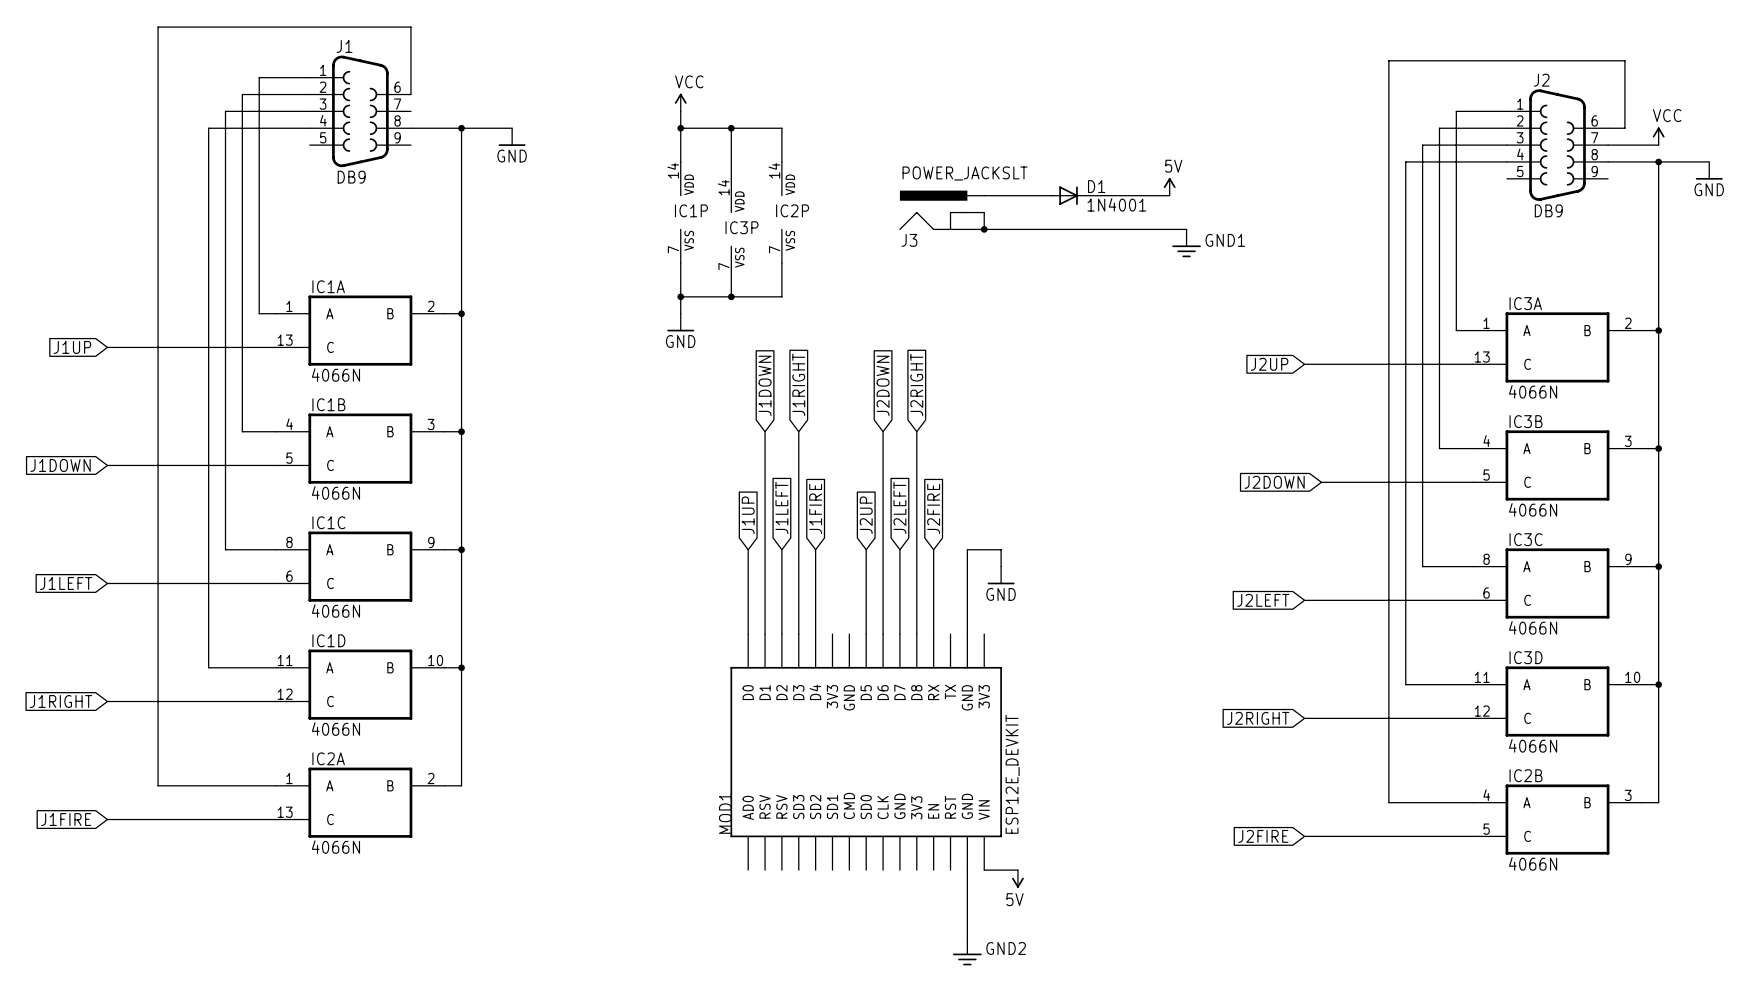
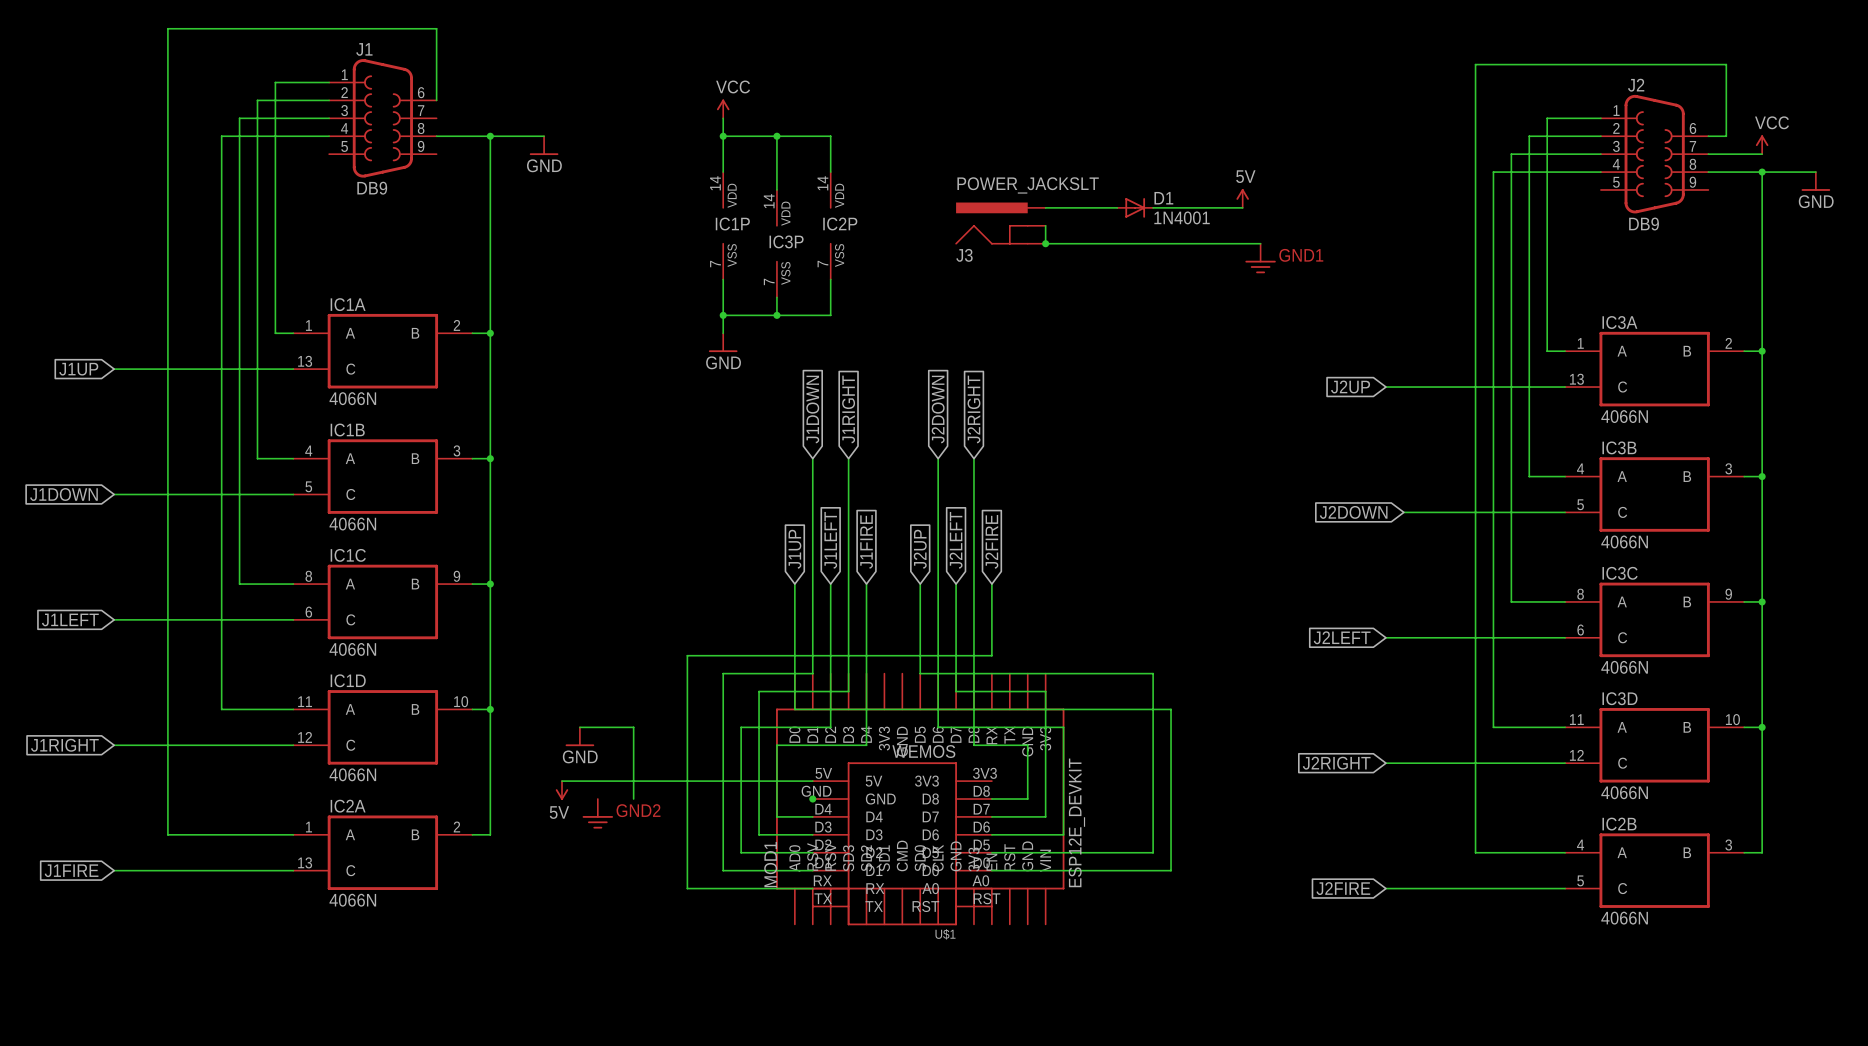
wire: (1001, 566) (1001, 549) (967, 549) (967, 634) -> none
power symbol: GND (1001, 575) -> none
wire: (933, 617) (933, 634) -> (991, 655) (687, 655) (687, 888) (812, 888)
wire: none -> (794, 673) (794, 709) (1171, 709) (1171, 870) (991, 870)
wire: none -> (812, 673) (723, 673) (723, 870) (812, 870)
wire: none -> (830, 673) (830, 727) (741, 727) (741, 852) (812, 852)
wire: none -> (848, 673) (848, 691) (759, 691) (759, 834) (812, 834)
wire: none -> (866, 673) (866, 745) (776, 745) (776, 816) (812, 816)
wire: none -> (920, 673) (1153, 673) (1153, 852) (991, 852)
wire: none -> (938, 673) (938, 727) (1063, 727) (1063, 834) (991, 834)
wire: none -> (956, 673) (956, 691) (1045, 691) (1045, 816) (991, 816)
wire: none -> (973, 673) (973, 745) (1027, 745) (1027, 799) (991, 799)
wire: none -> (579, 727) (633, 727) (633, 799)
power symbol: none -> GND (579, 736)
wire: none -> (562, 781) (812, 781)
power symbol: none -> 5V (562, 790)
junction: none -> (812, 799)
U$1: none -> WEMOS (902, 843)
wire: (967, 870) (967, 937) -> none
wire: (984, 870) (1017, 870) -> none
power symbol: 5V (1017, 878) -> none
GND2 position: (967, 951) -> (597, 813)

